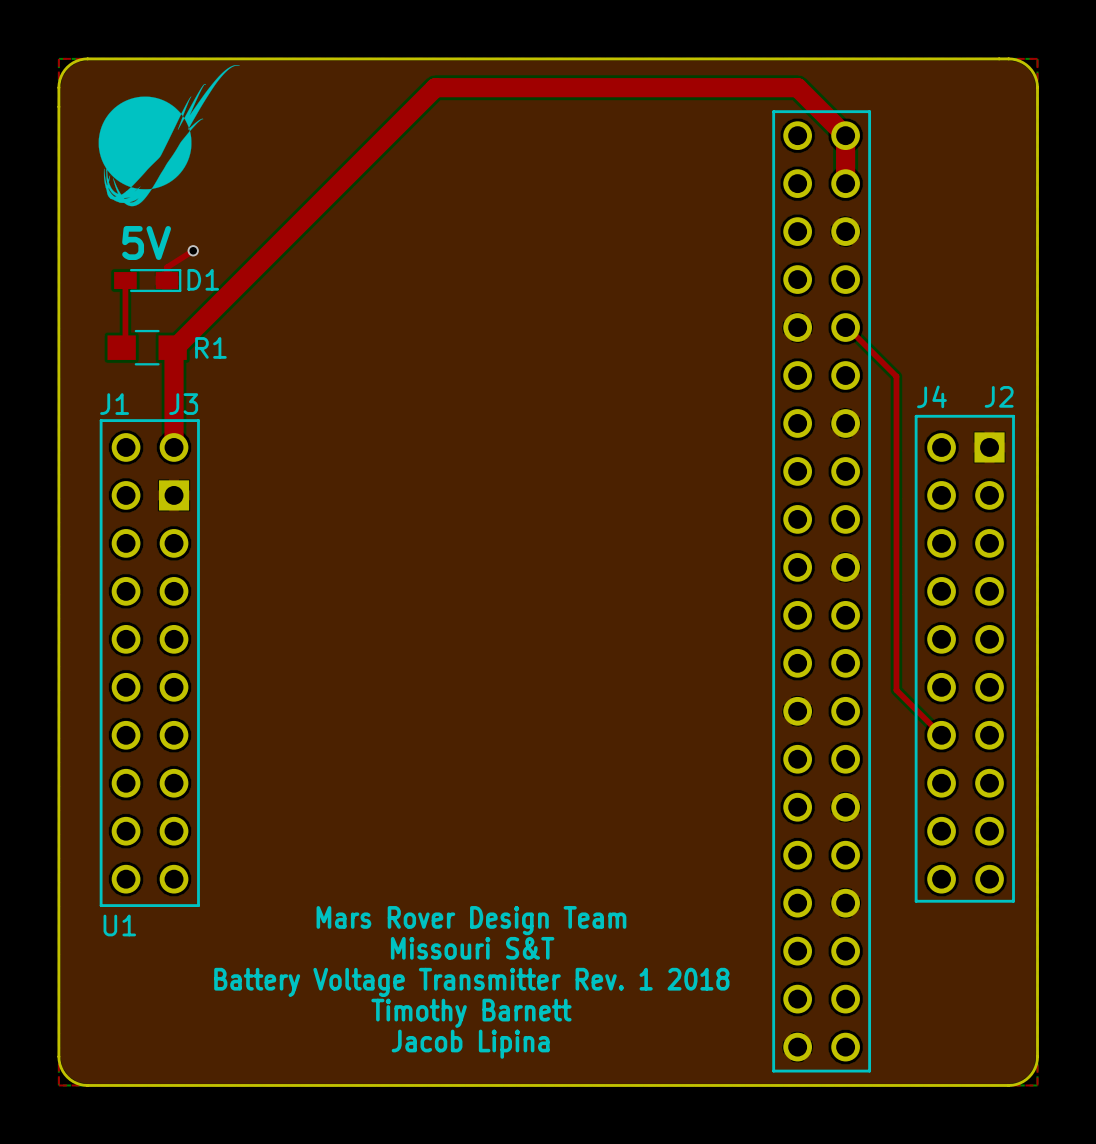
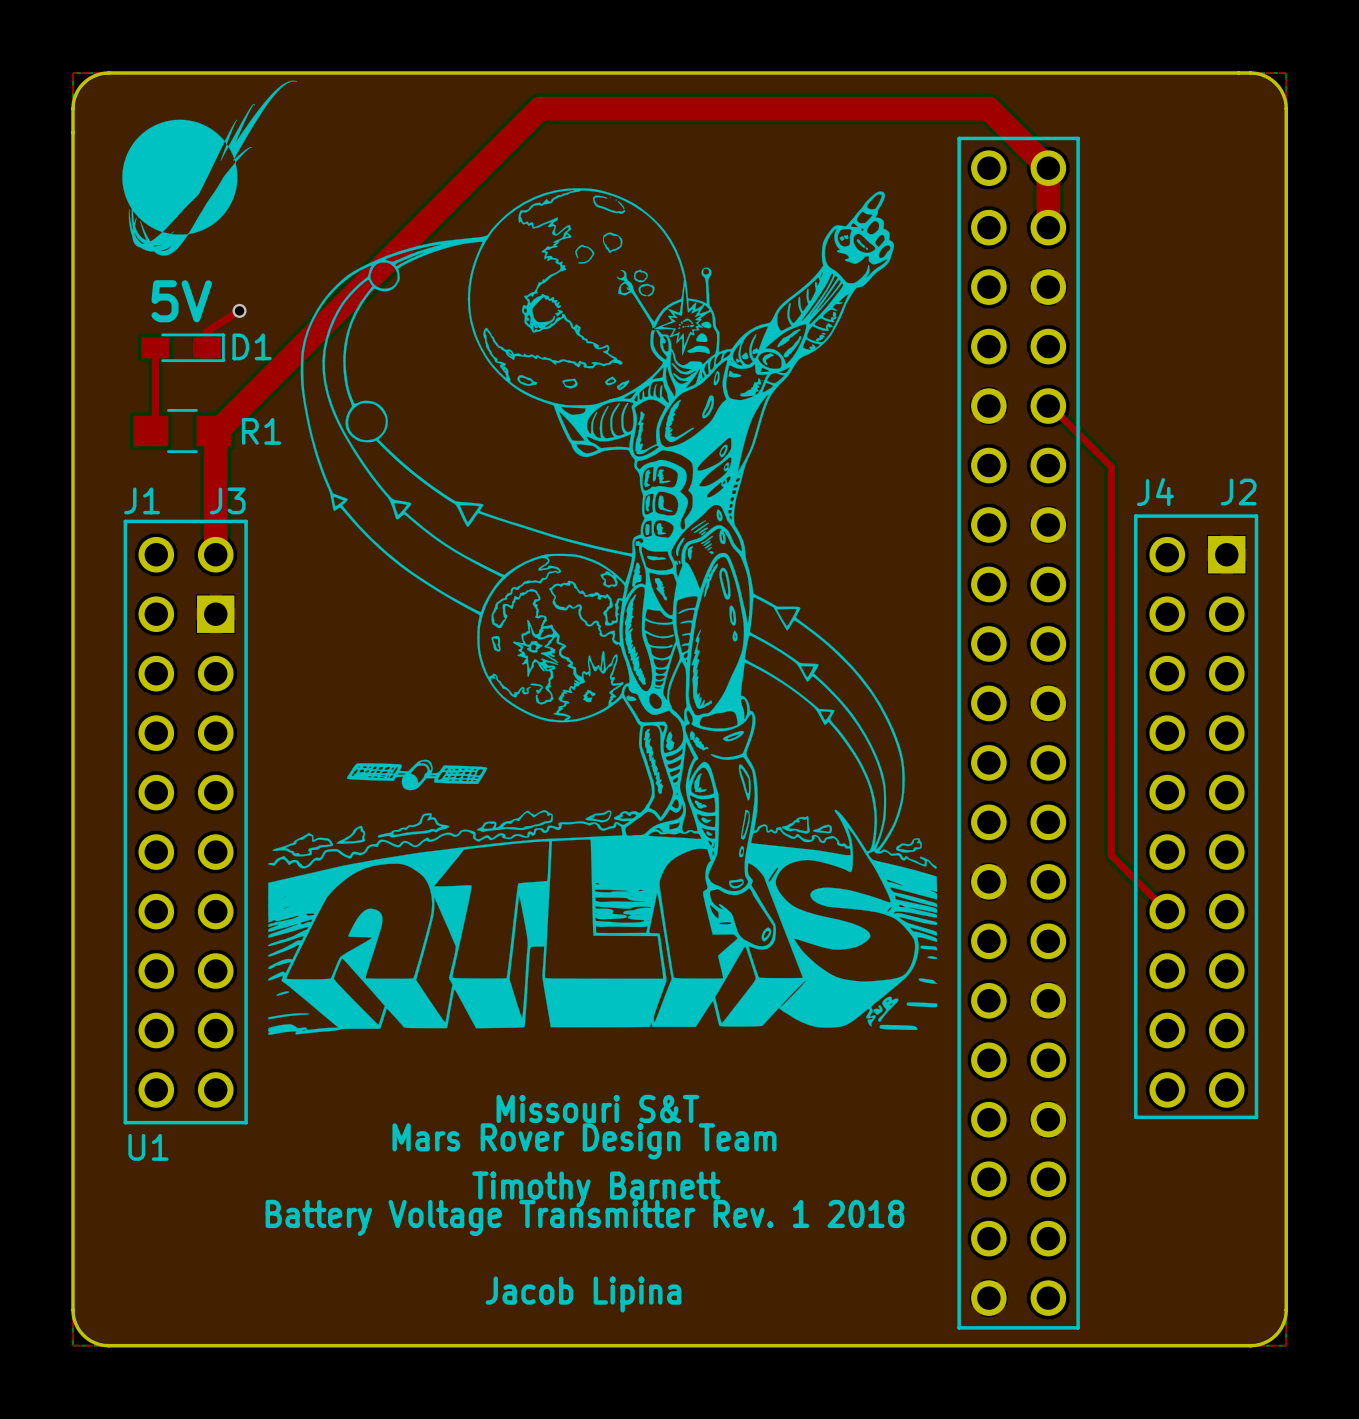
drawing: none -> [268, 188, 938, 1035]
text position: Missouri S&T (472, 948) -> Missouri S&T (597, 1108)
text position: Timothy Barnett (471, 1013) -> Timothy Barnett (596, 1189)

